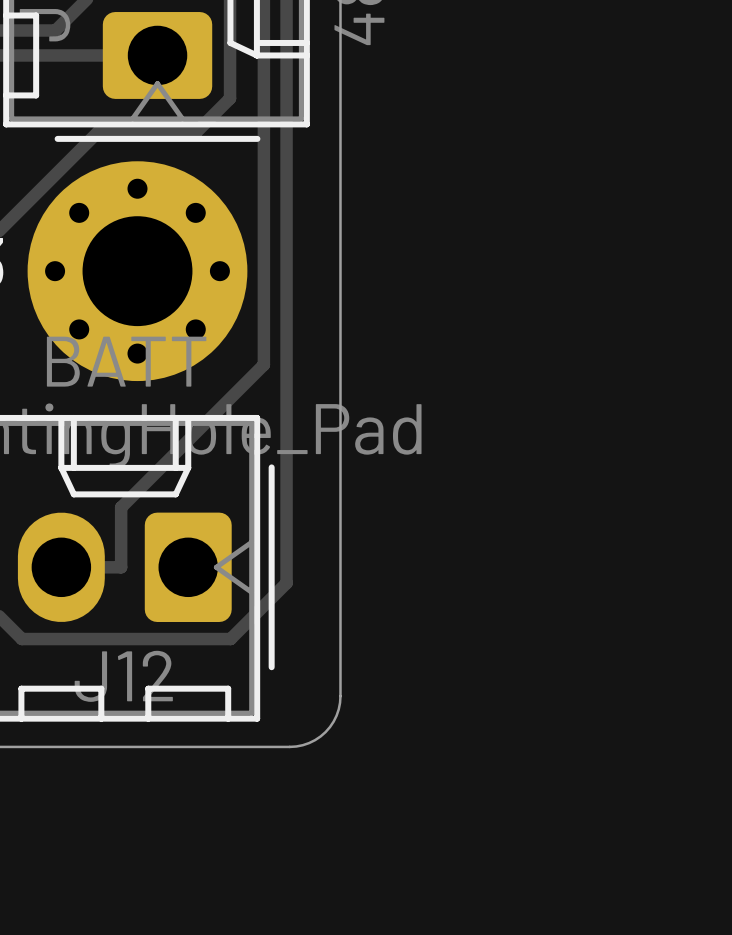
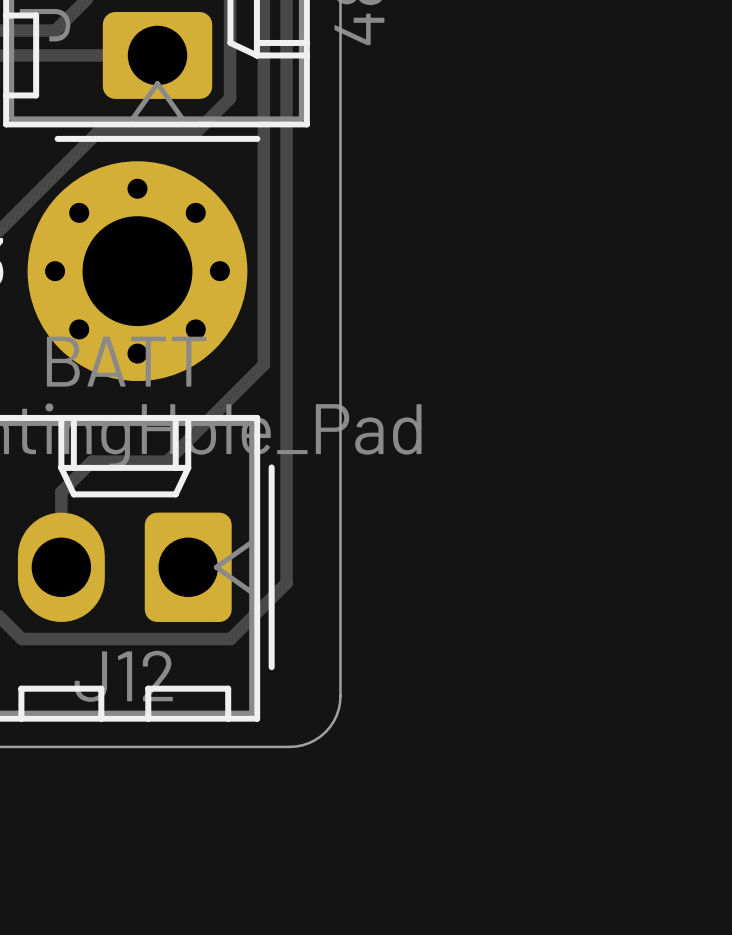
track: (167, 461) (121, 507) (121, 567) (61, 567) -> (167, 461) (91, 461) (61, 492) (61, 567)

